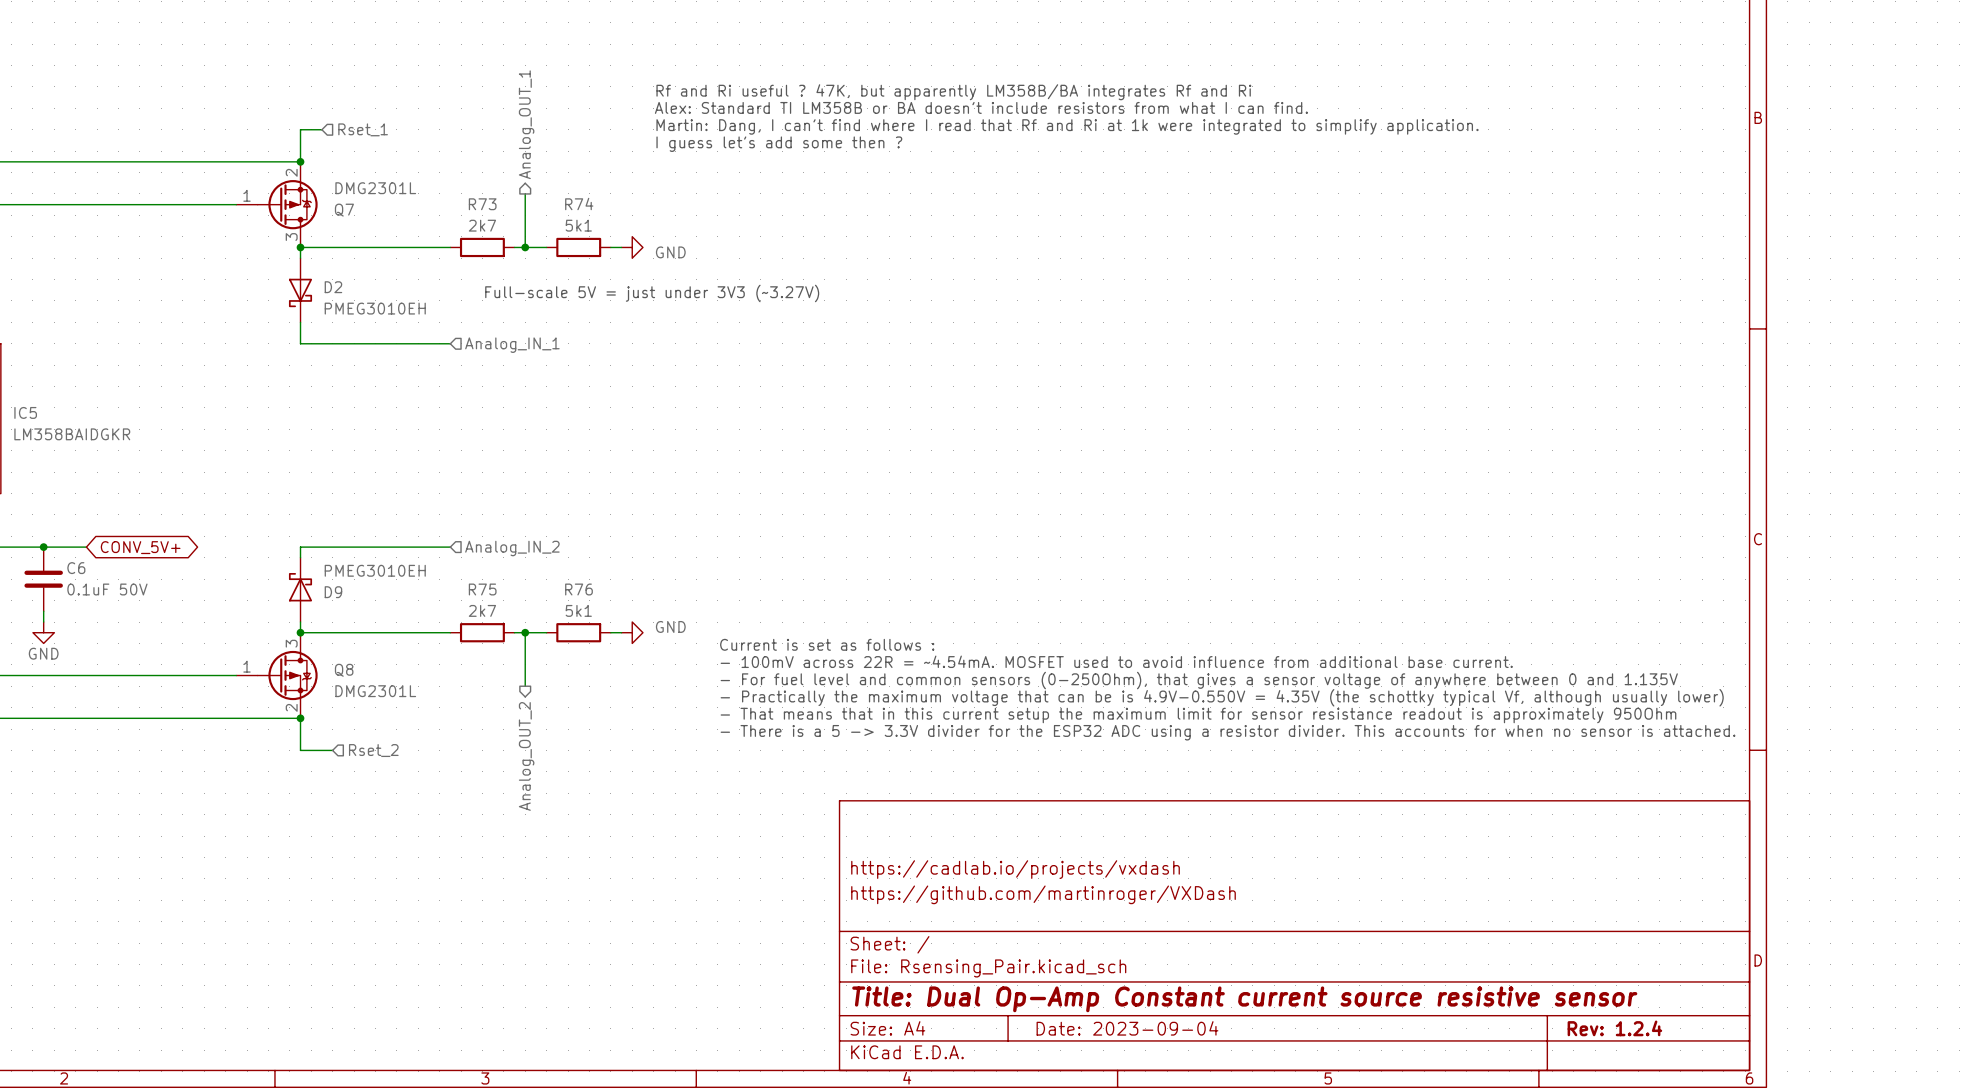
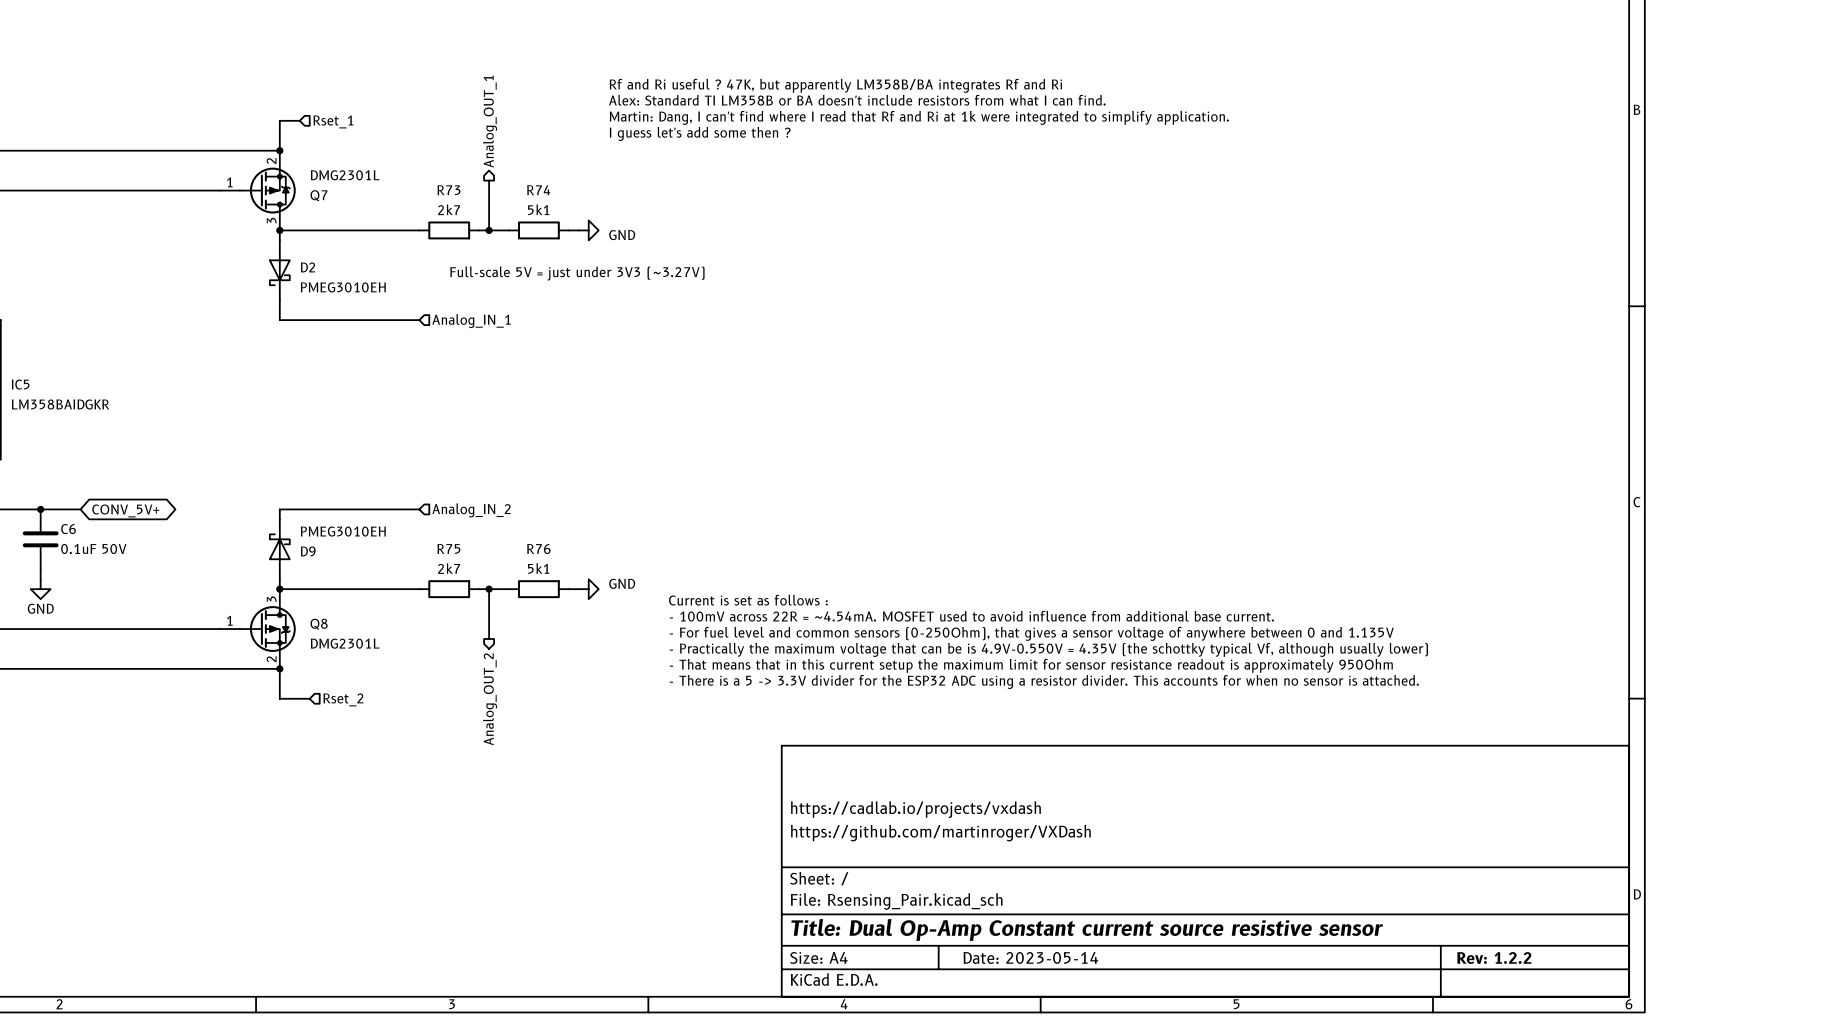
title block: Date: 2023-09-04 (1127, 1028) -> Date: 2023-05-14 (1030, 957)
title block: Rev: 1.2.4 (1614, 1028) -> Rev: 1.2.2 (1494, 957)

